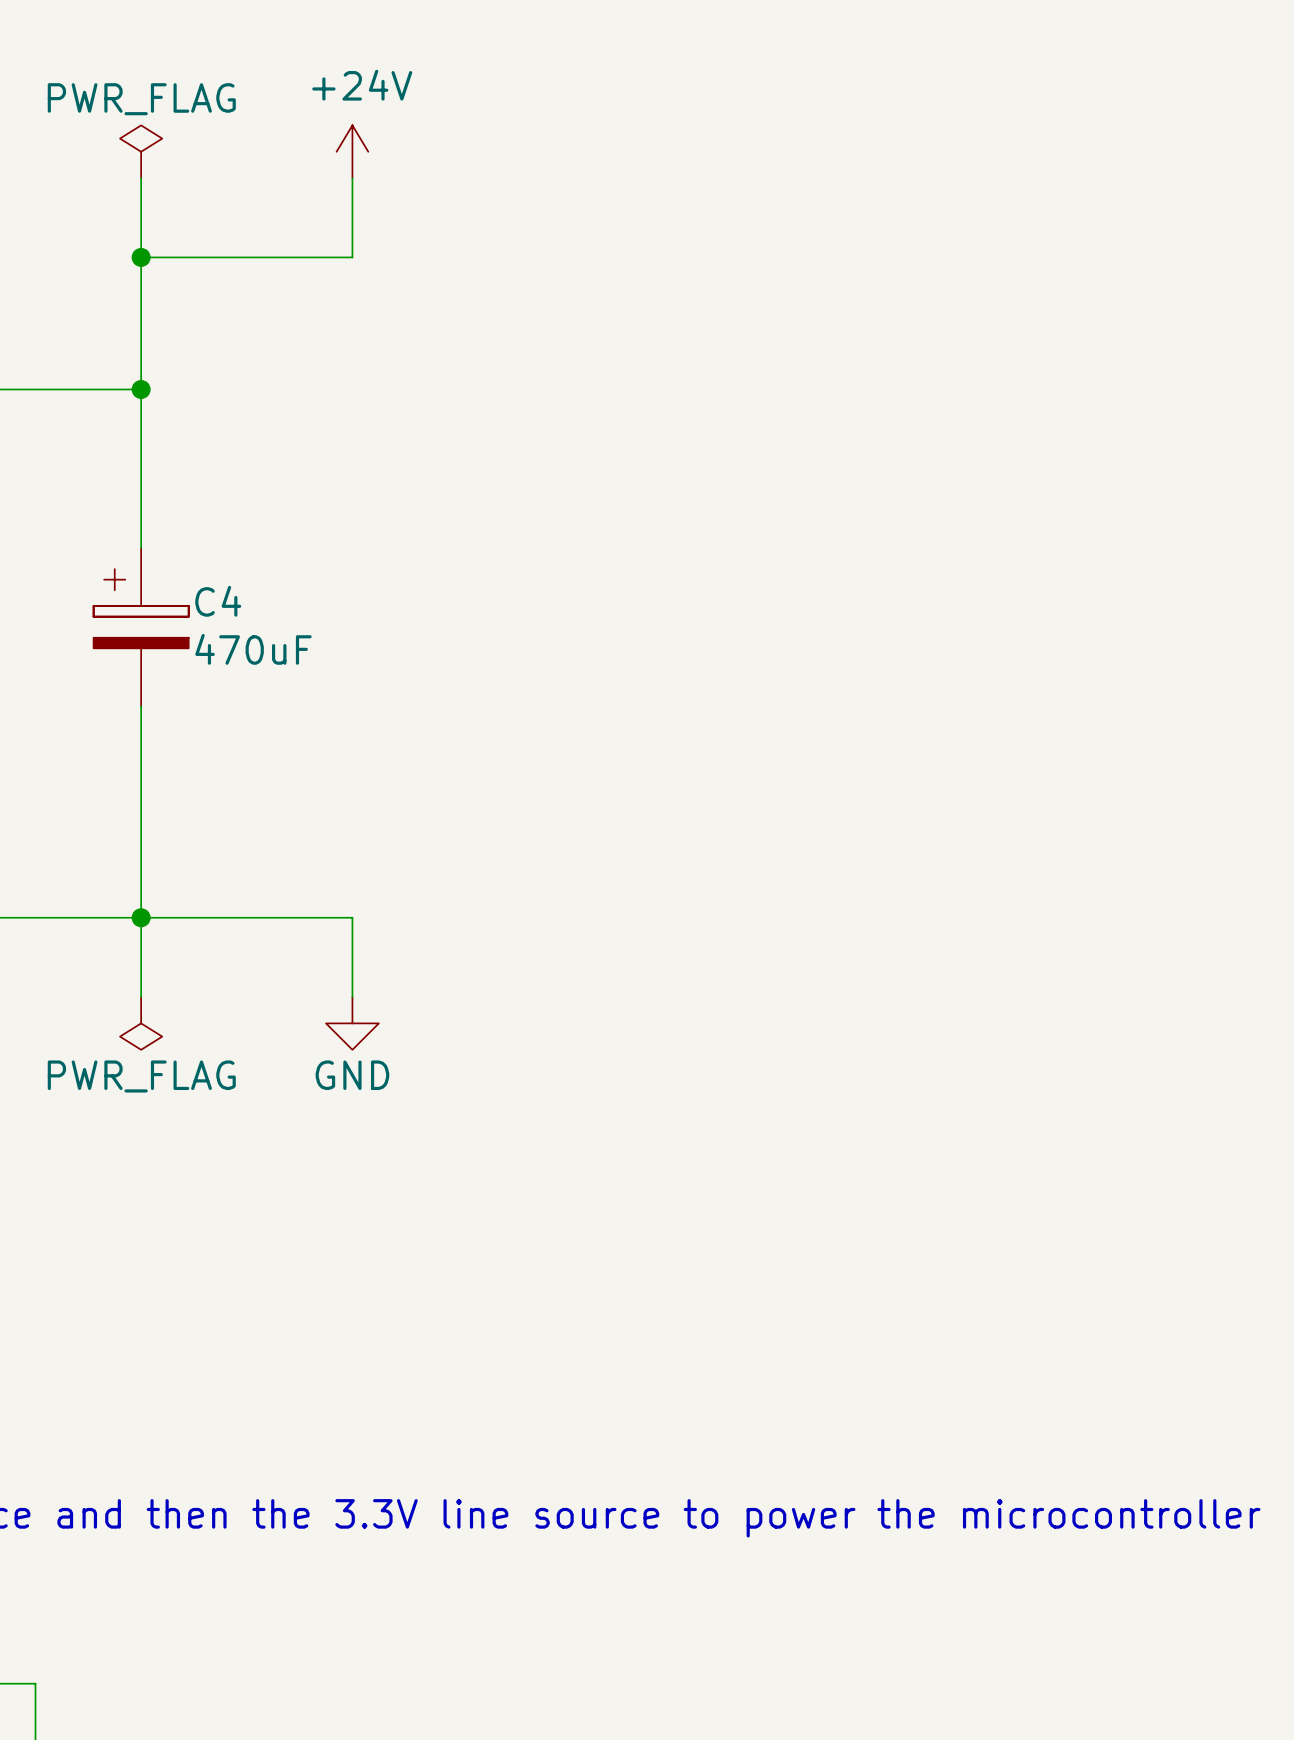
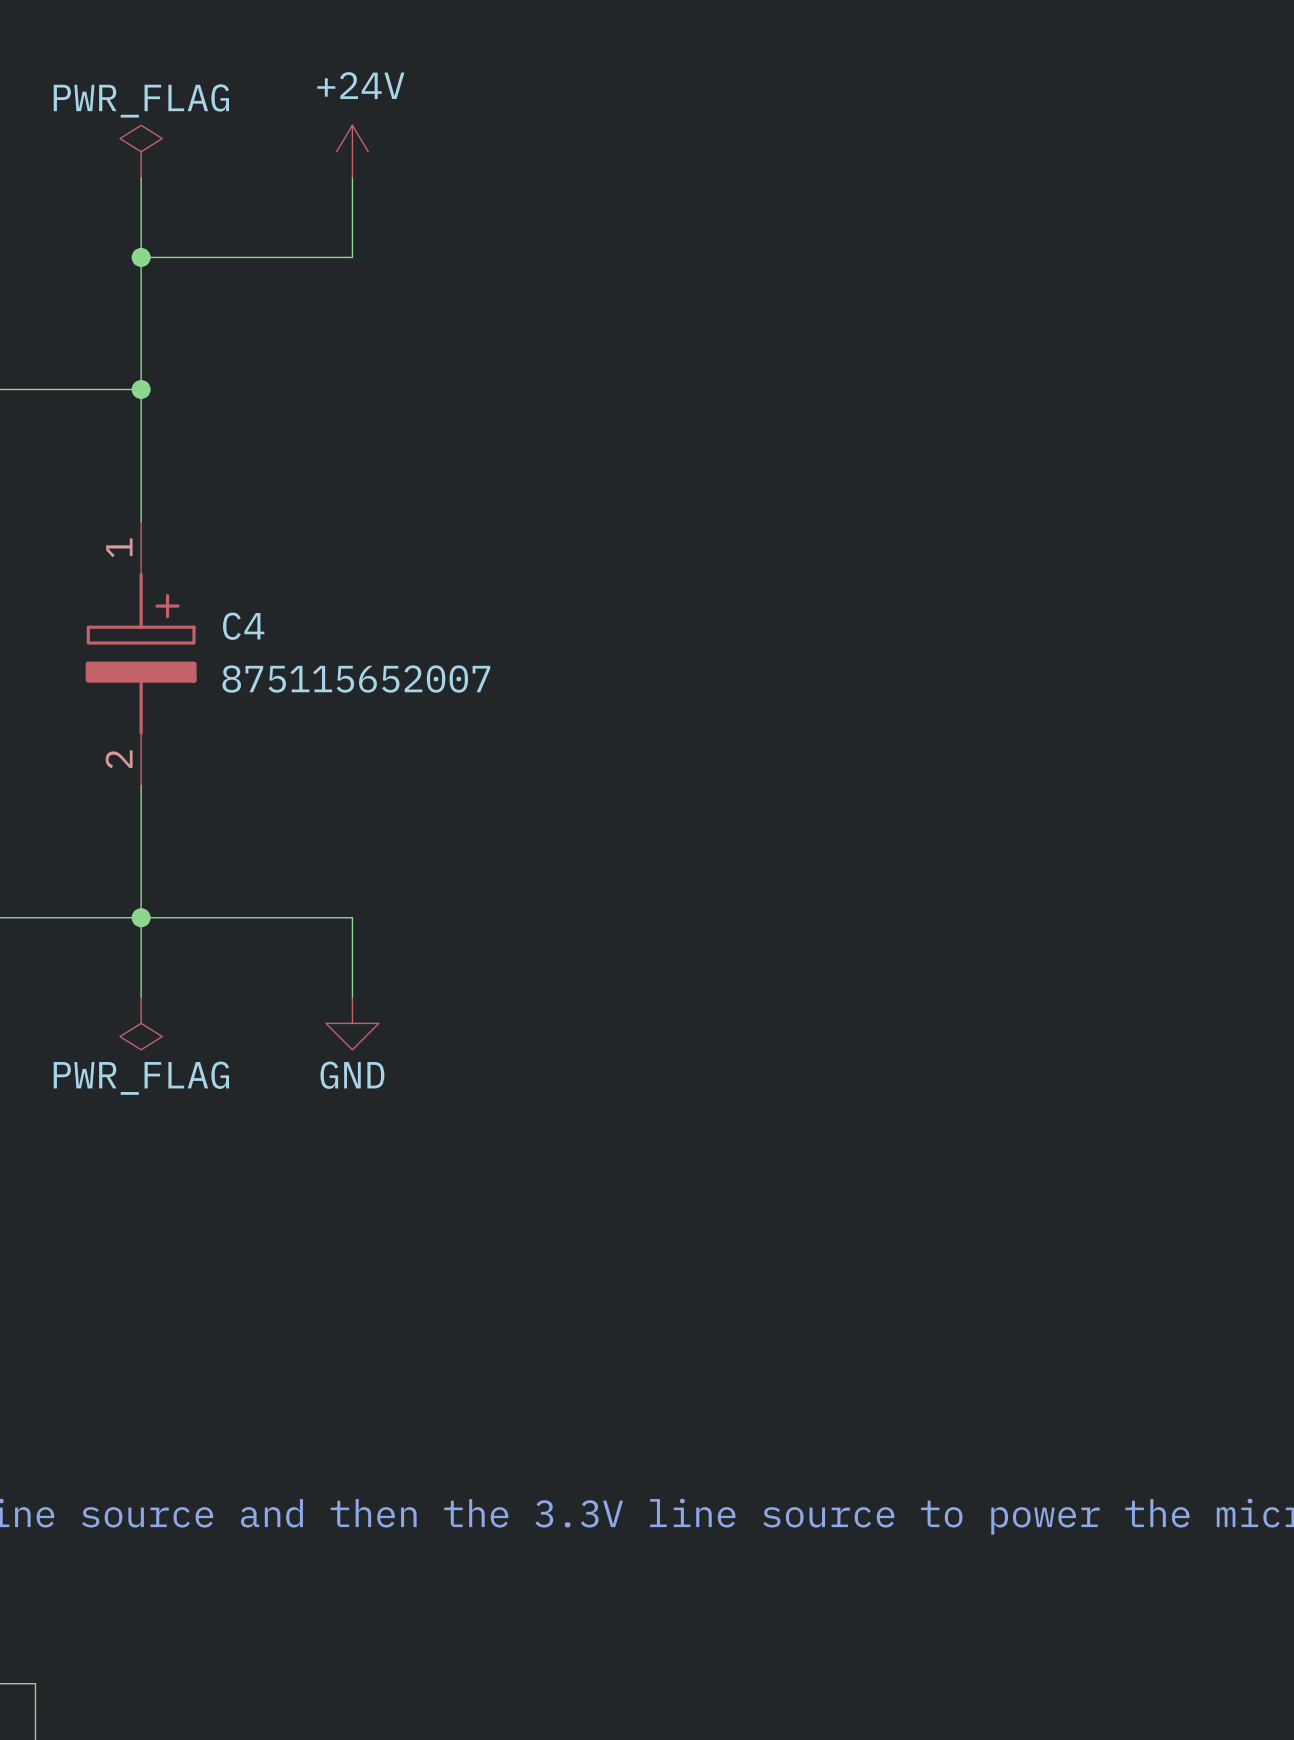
C4 symbol: [93, 547, 189, 707] -> [85, 521, 197, 786]
C4 value: 470uF (253, 649) -> 875115652007 (356, 679)

